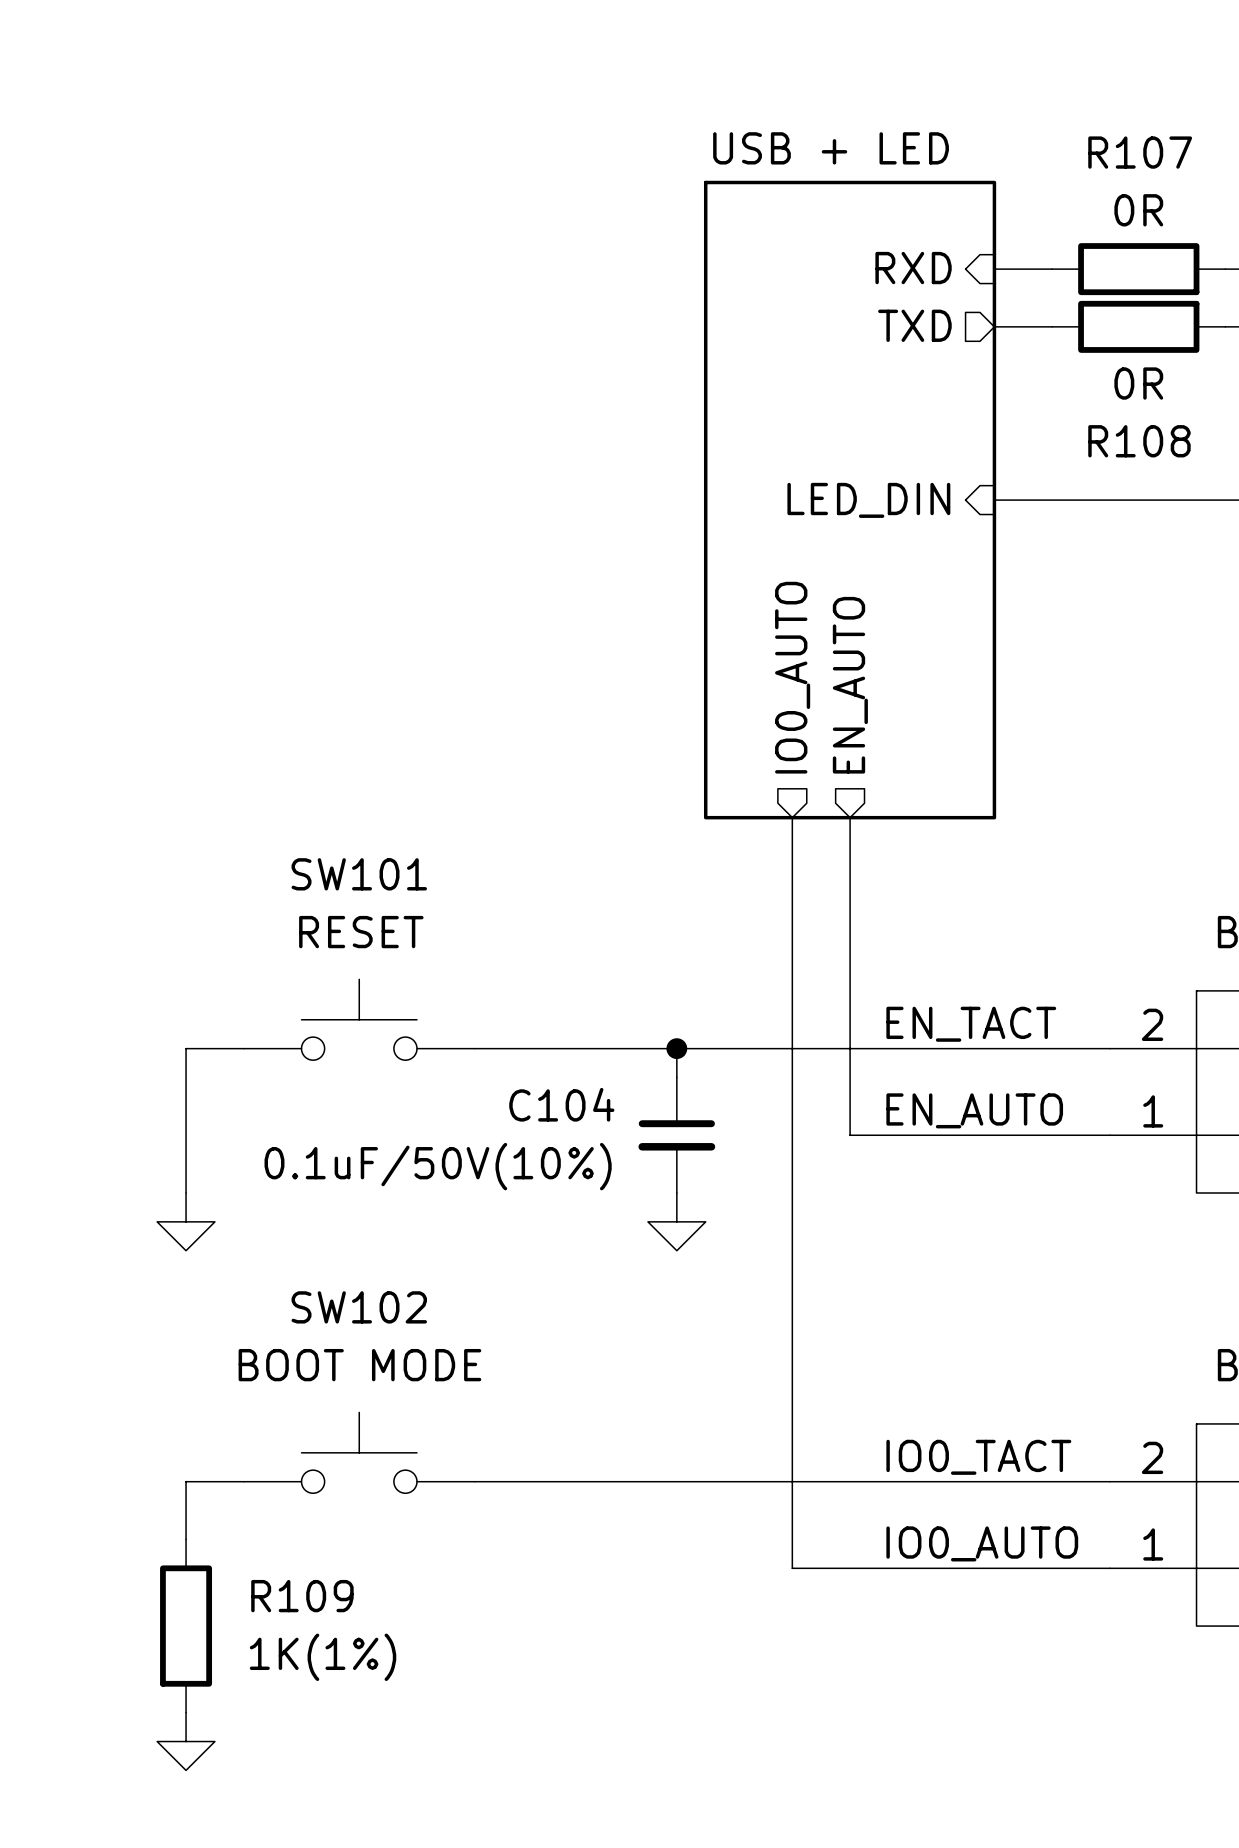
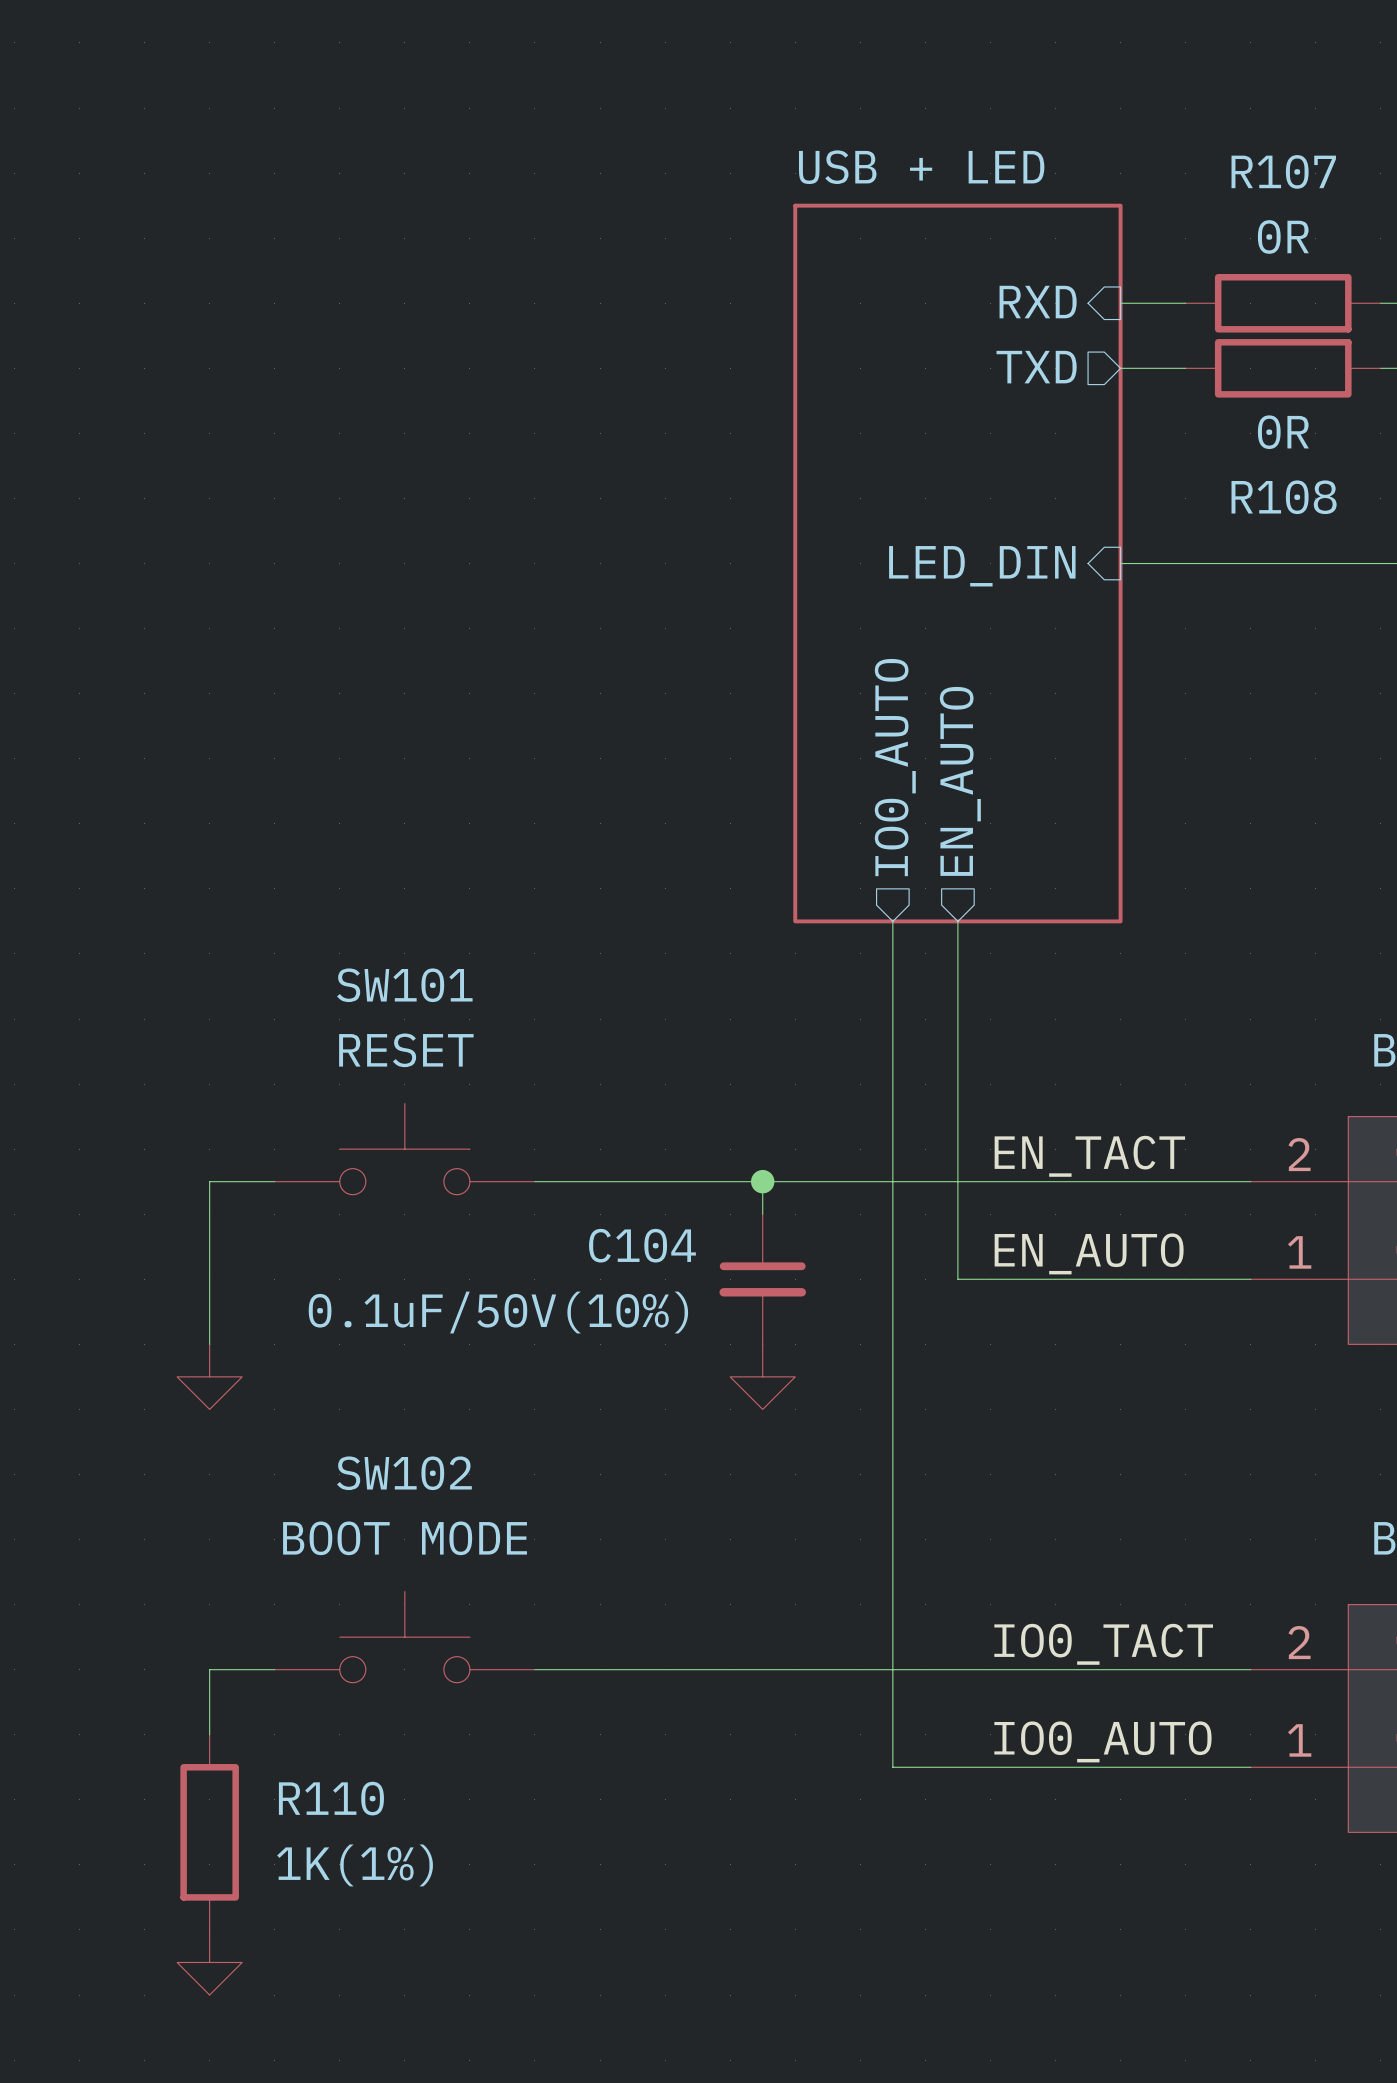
R109 name: R109 (302, 1596) -> R110 (331, 1798)

